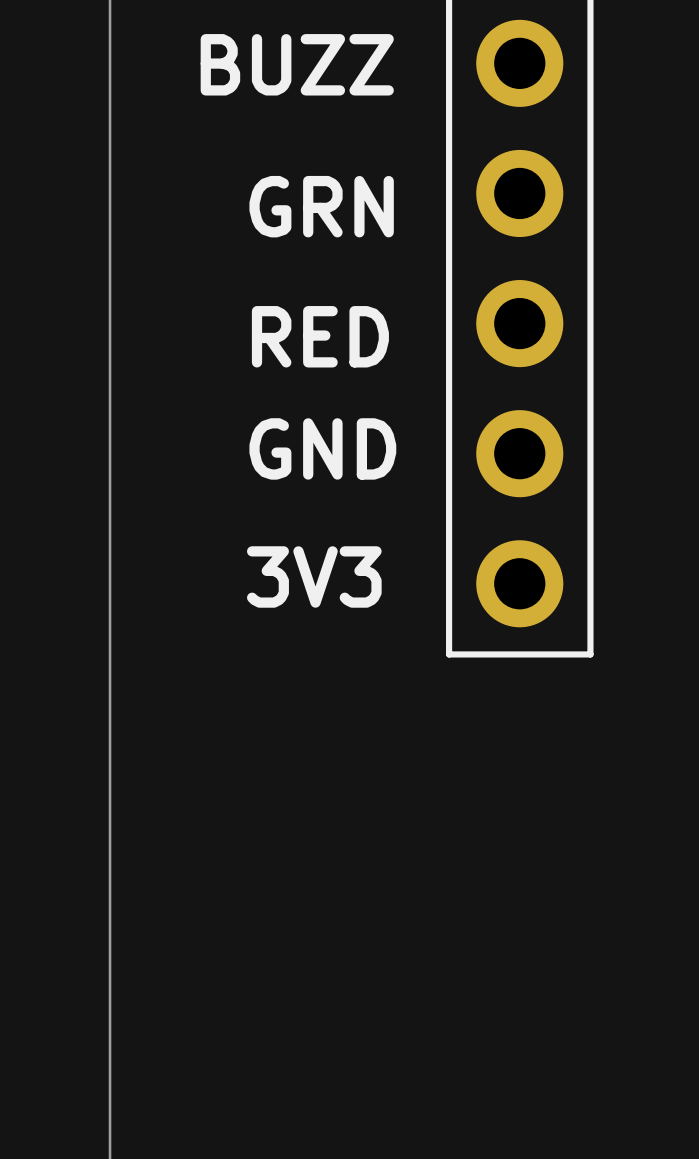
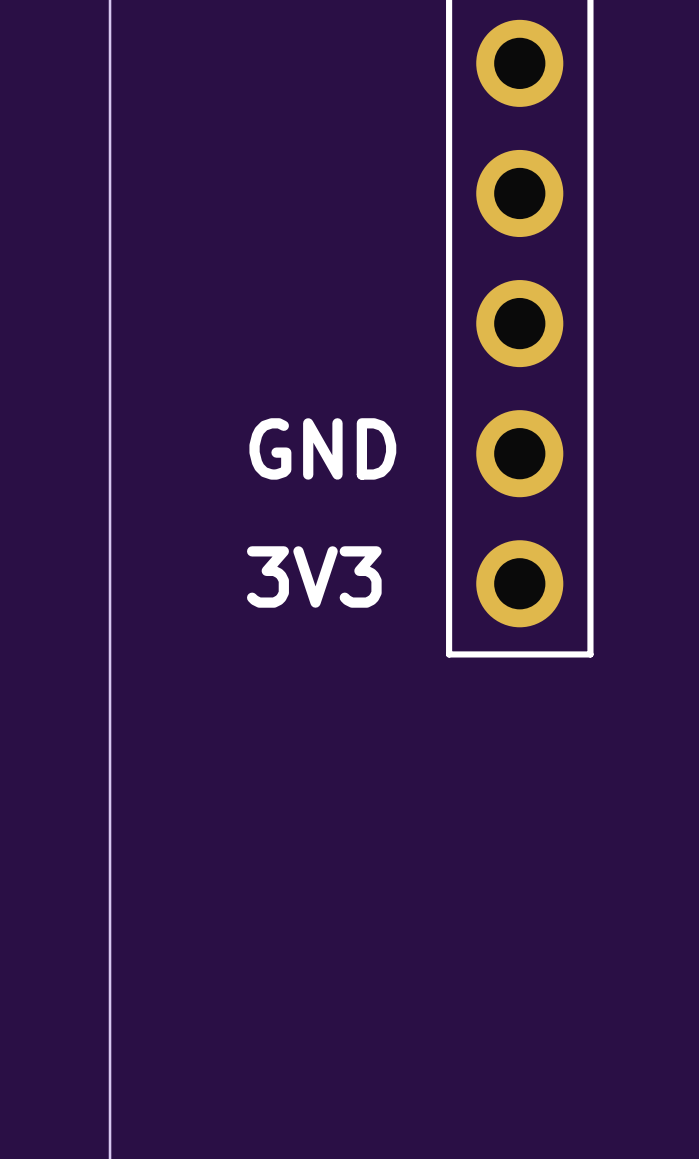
text: BUZZ (297, 64) -> none
text: GRN (321, 206) -> none
text: RED (320, 336) -> none

